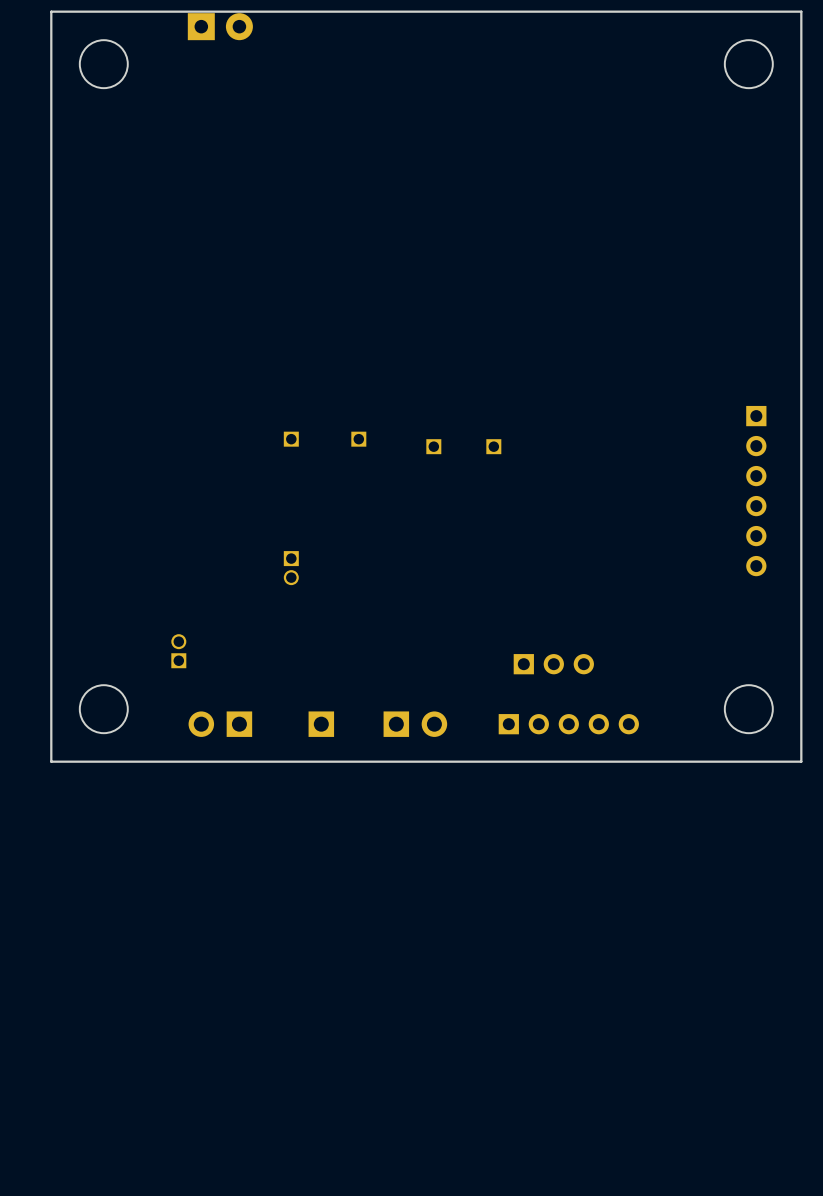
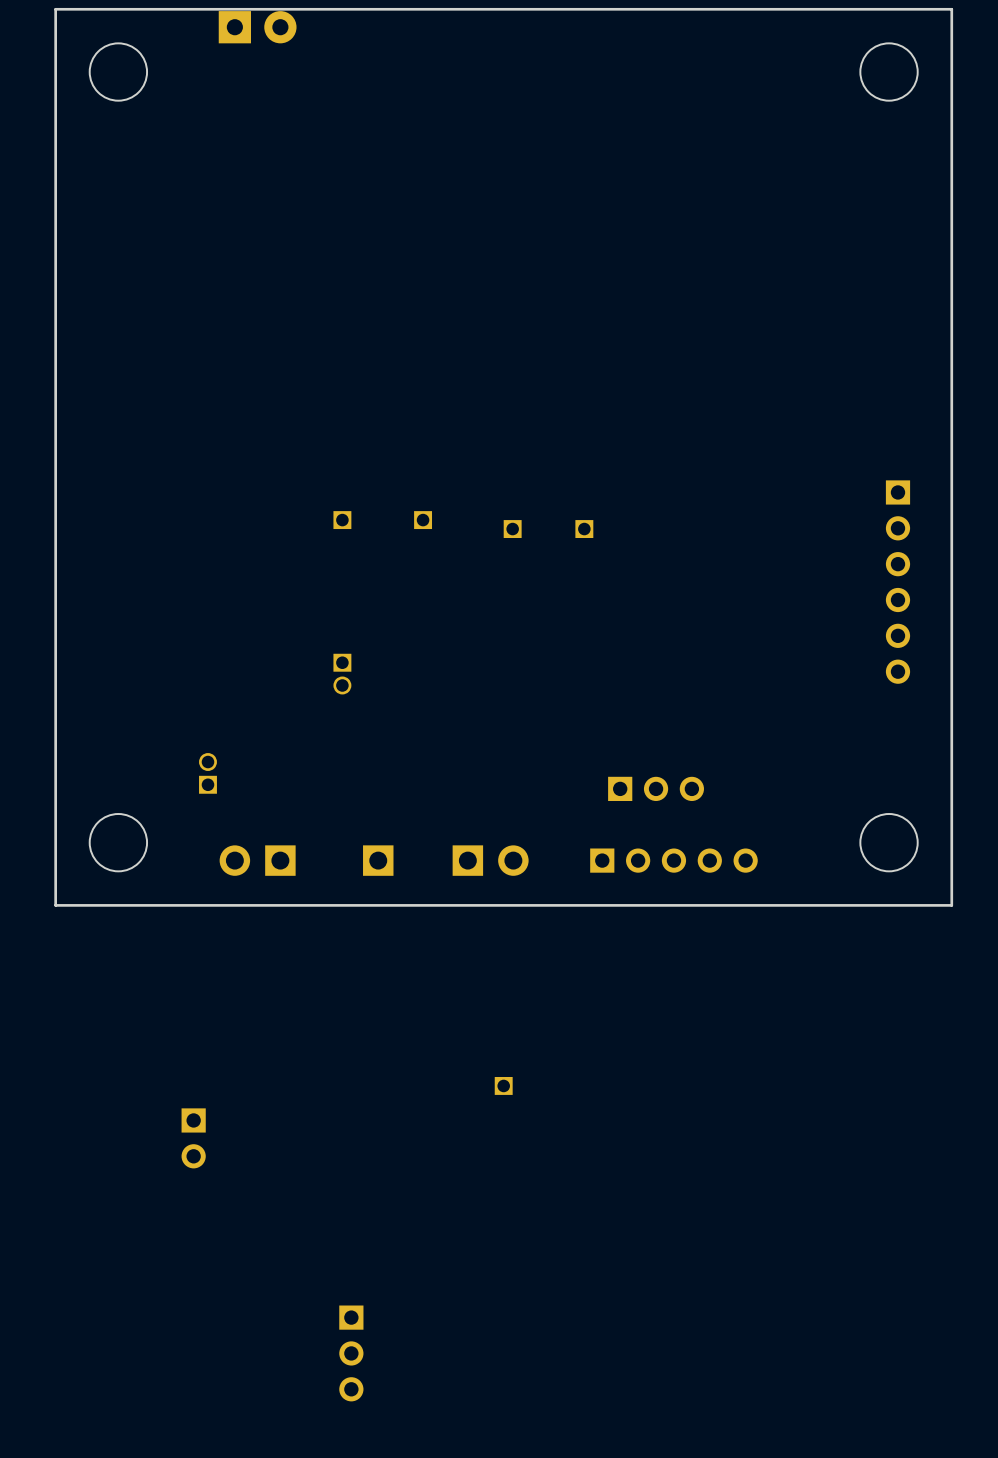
part: none -> (503, 1085)
part: none -> (193, 1138)
part: none -> (351, 1353)

